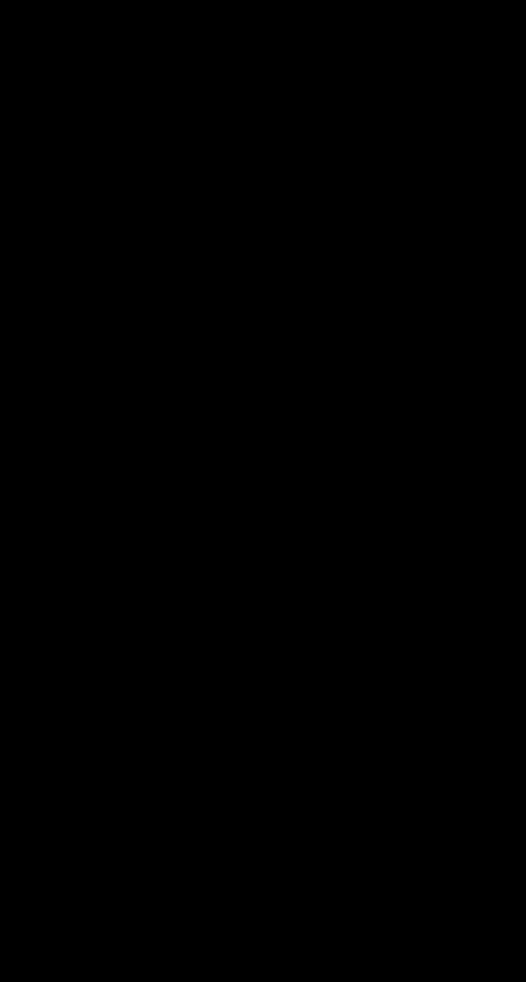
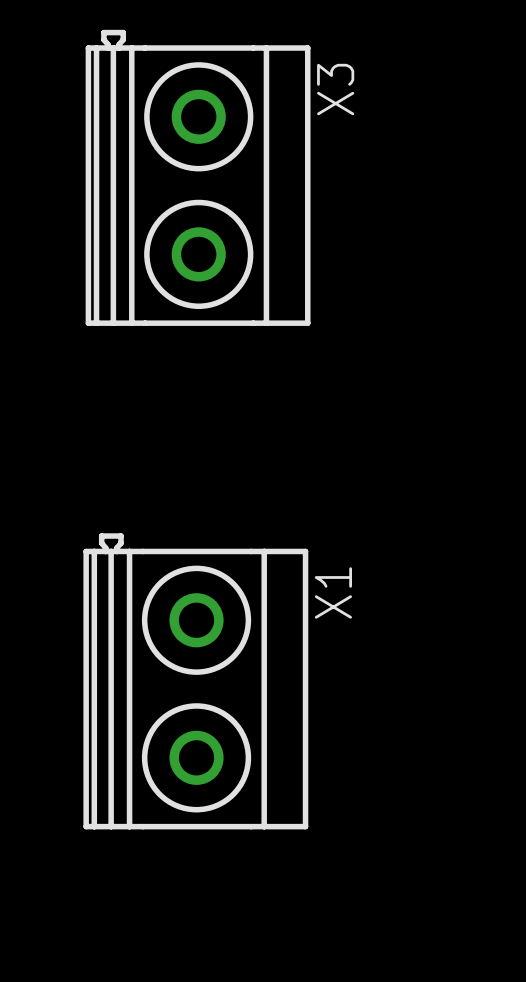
X3: none -> (198, 177)
X1: none -> (195, 681)

